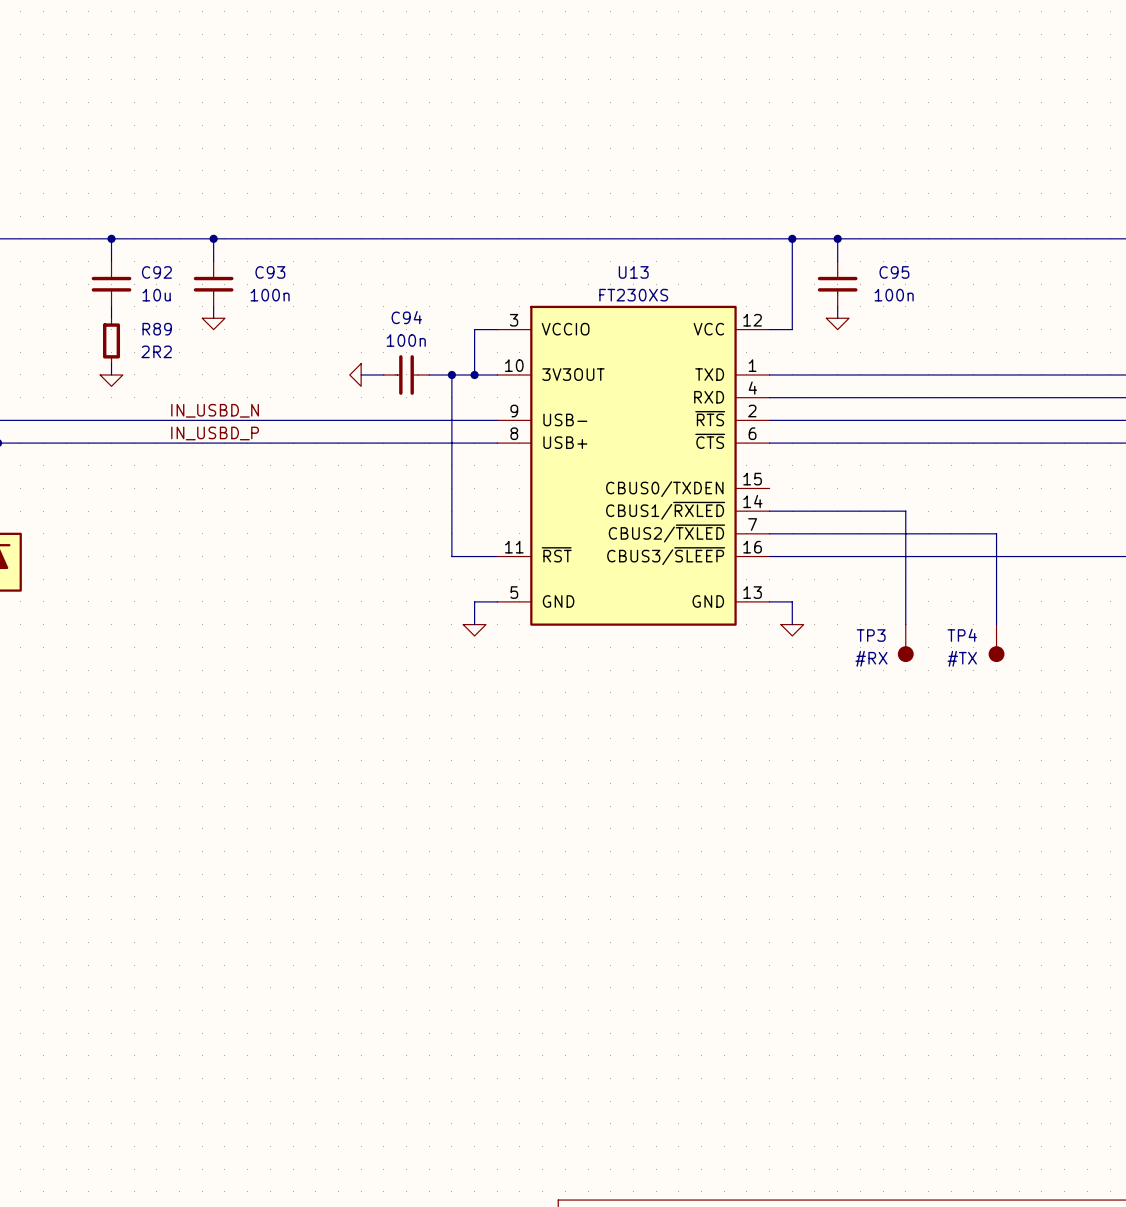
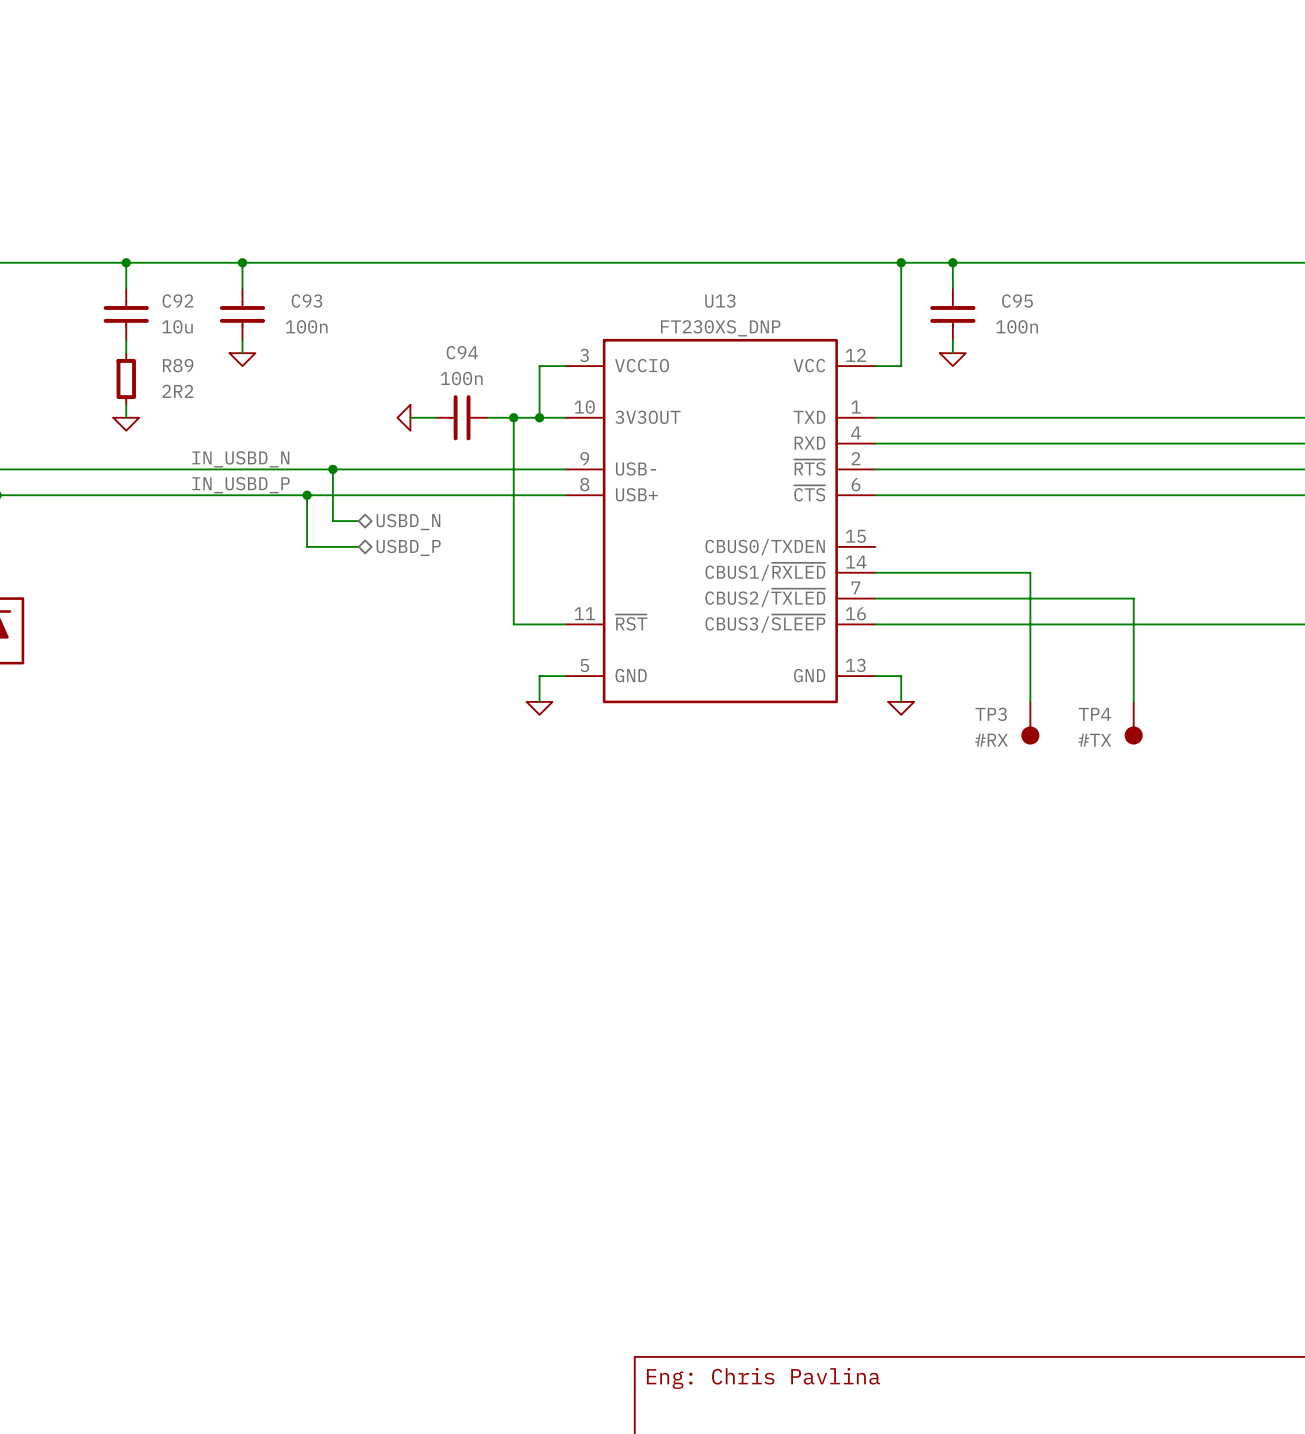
U13 value: FT230XS (633, 295) -> FT230XS_DNP (720, 328)
wire: none -> (332, 469) (332, 521) (358, 521)
junction: none -> (332, 469)
wire: none -> (307, 495) (307, 546) (358, 546)
junction: none -> (307, 495)
hierarchical label: none -> USBD_N (408, 522)
hierarchical label: none -> USBD_P (408, 547)

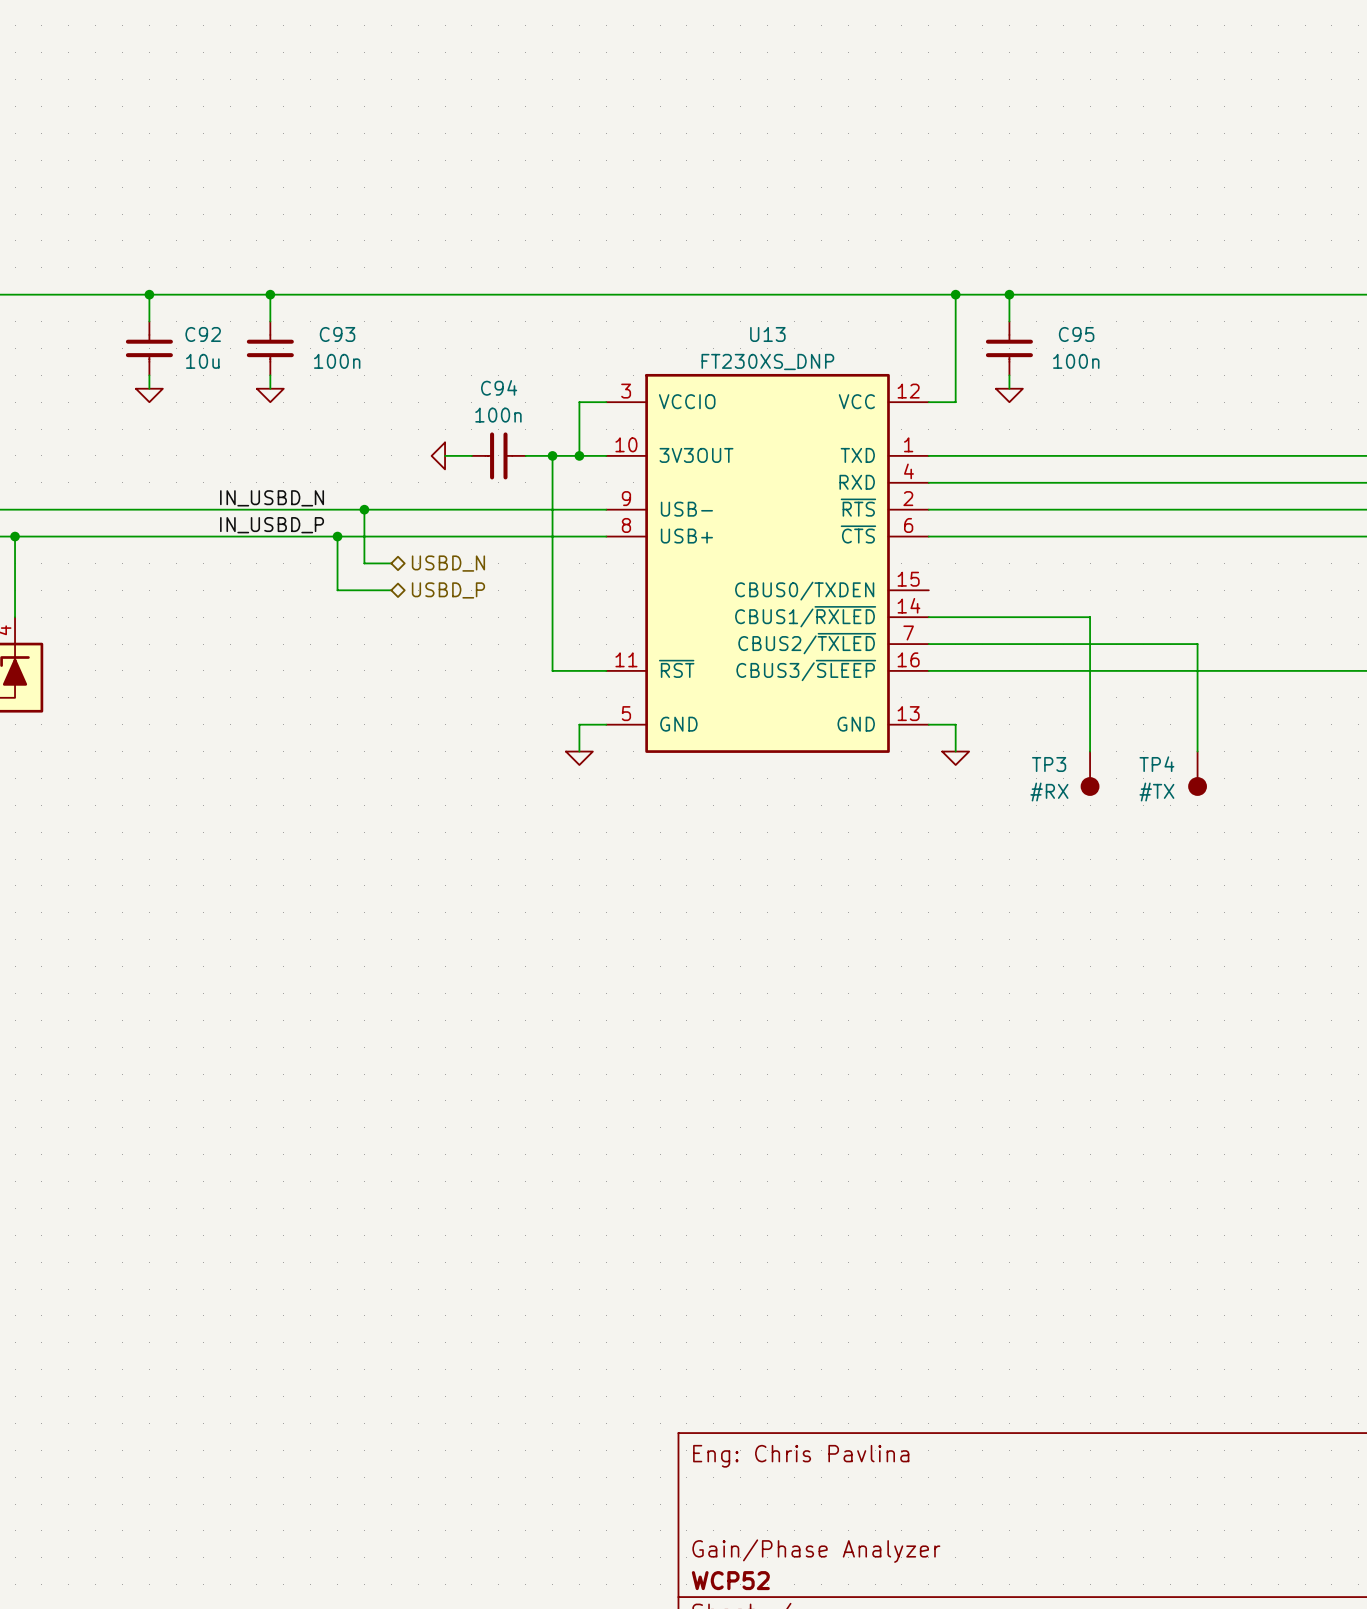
R89: 2R2 (126, 379) -> none
wire: (126, 404) (126, 417) -> none
power symbol position: (126, 424) -> (149, 395)

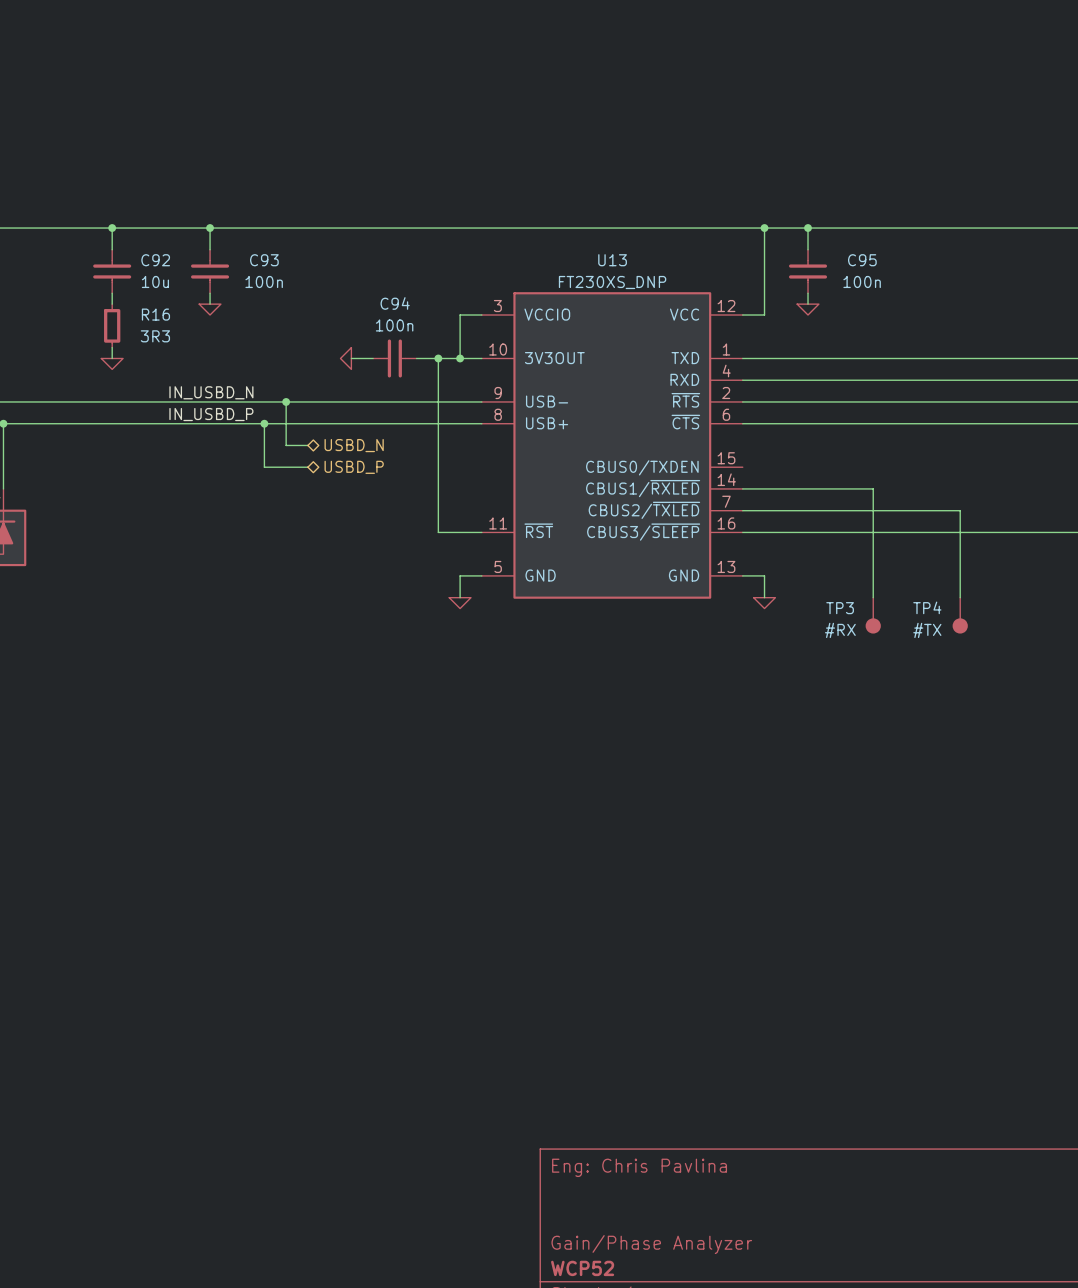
power symbol position: (149, 395) -> (112, 363)
R16: none -> 3R3 (112, 325)
wire: none -> (112, 347) (112, 358)

